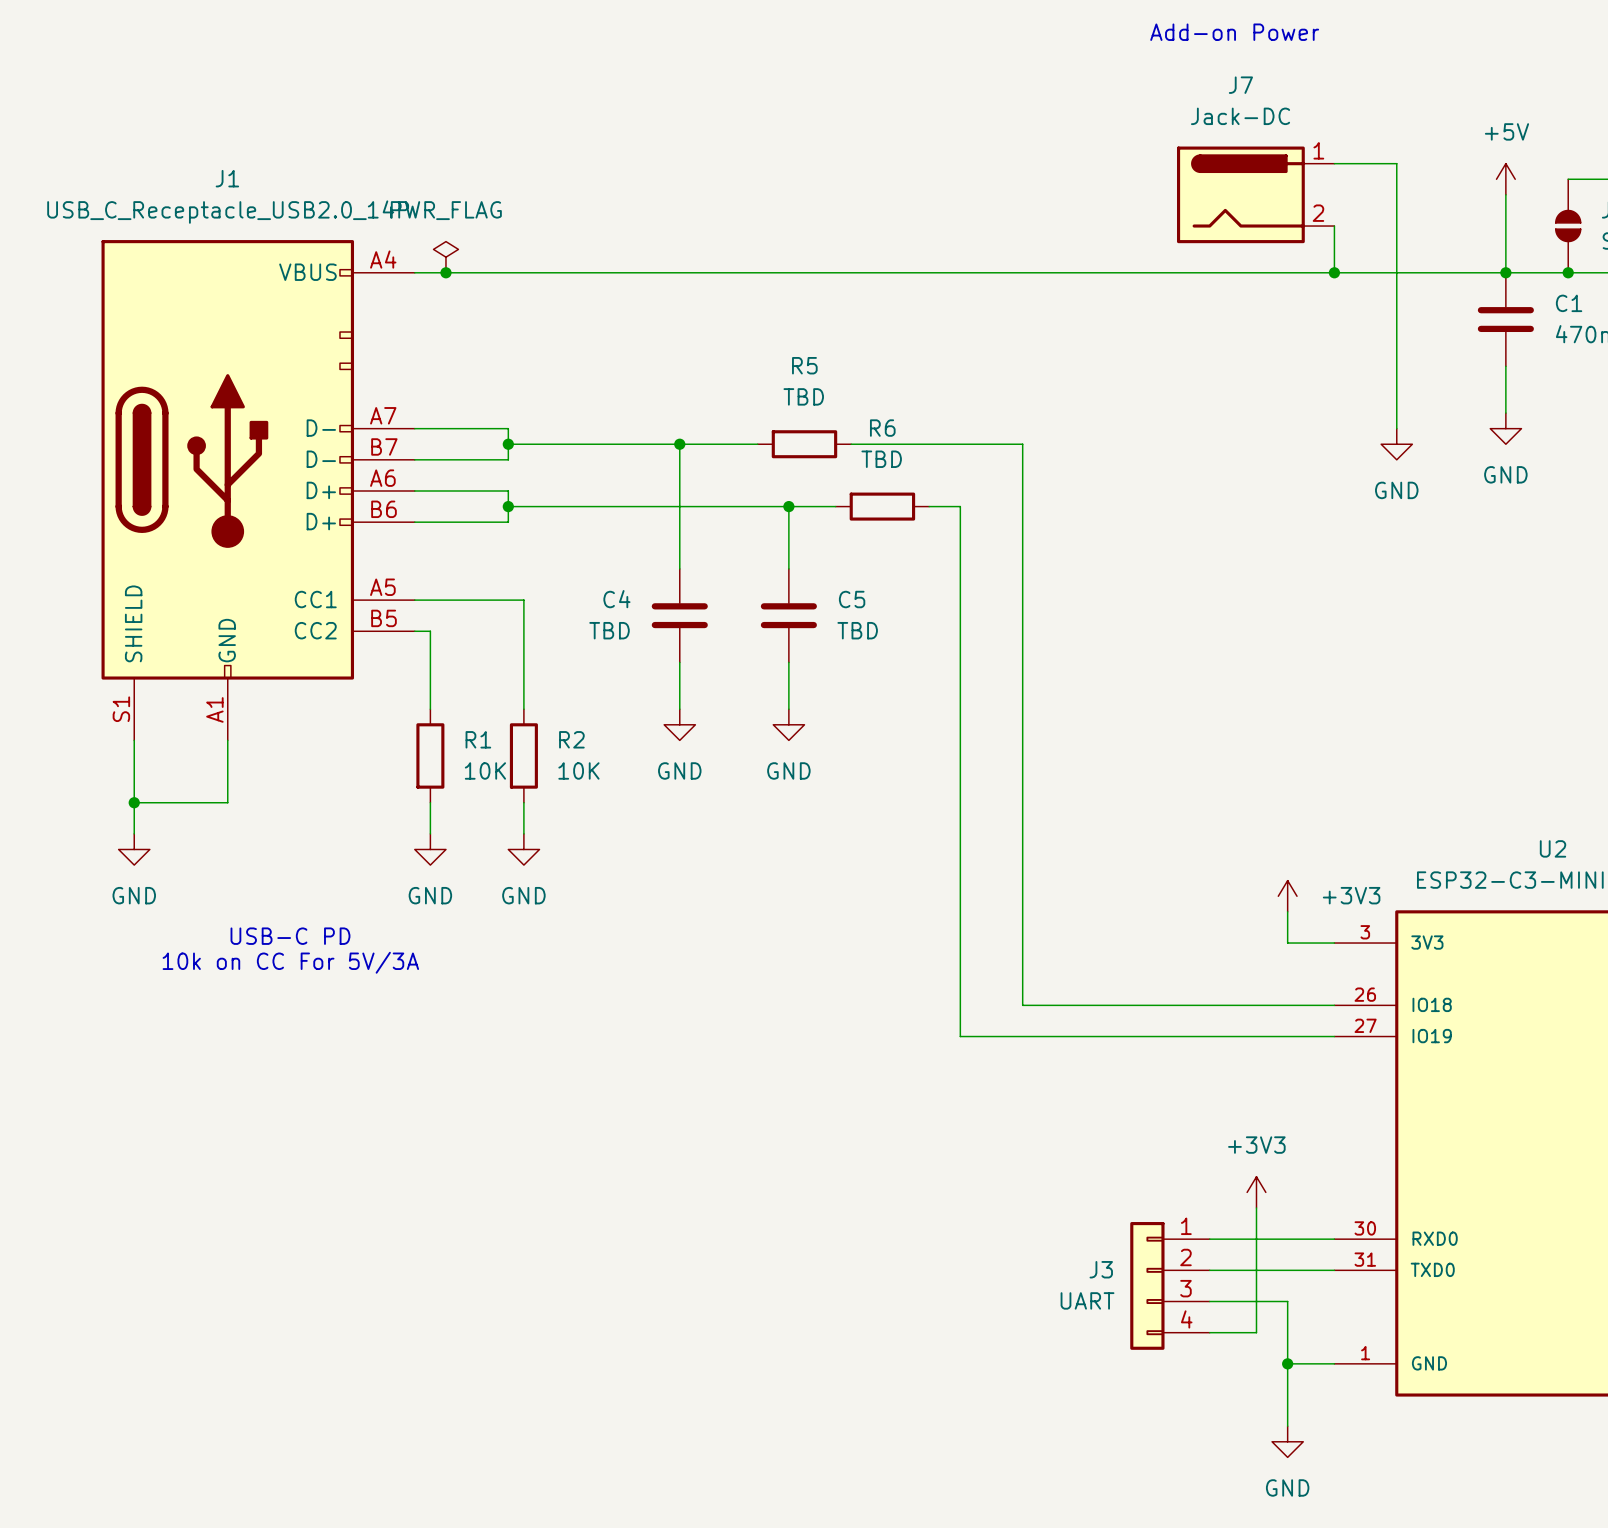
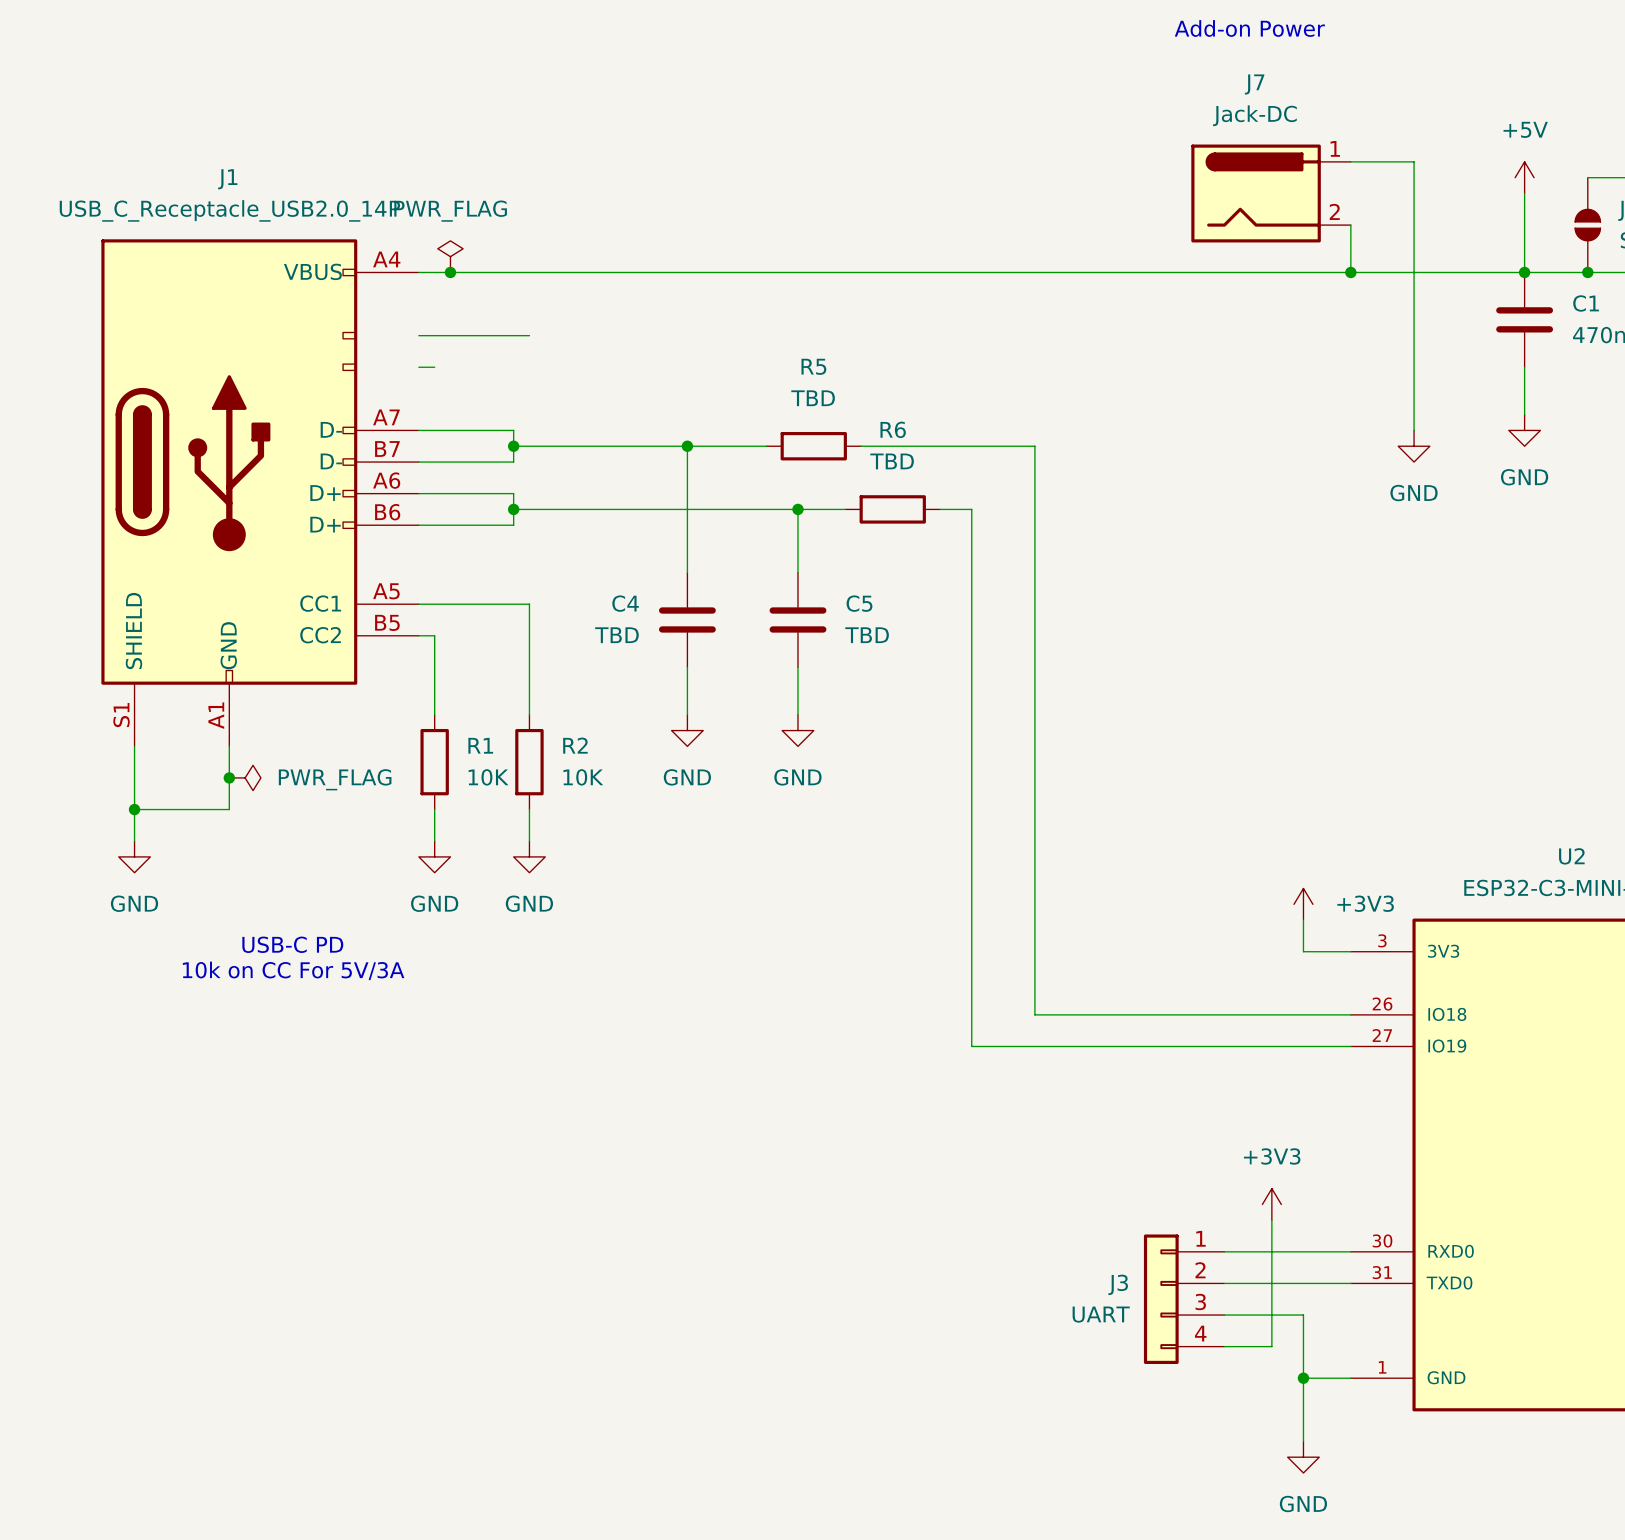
wire: none -> (418, 335) (529, 335)
wire: none -> (418, 367) (434, 367)
junction: none -> (229, 777)
power symbol: none -> PWR_FLAG (245, 777)

